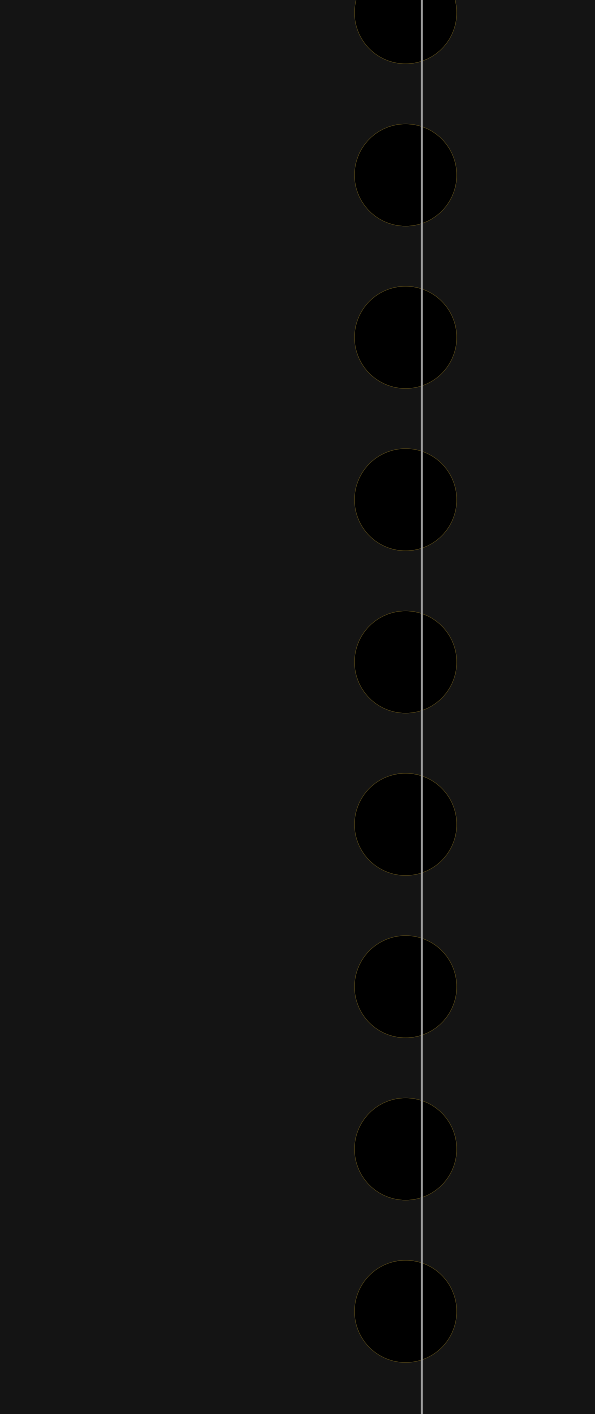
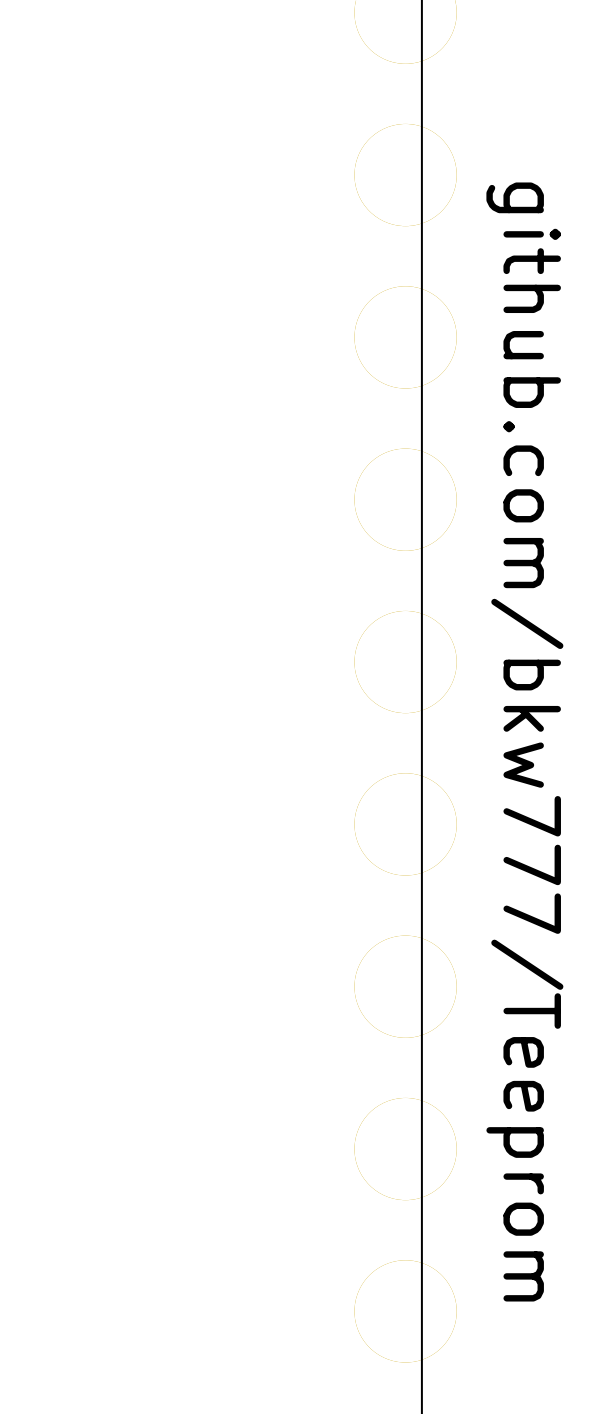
text: none -> github.com/bkw777/Teeprom (524, 741)

